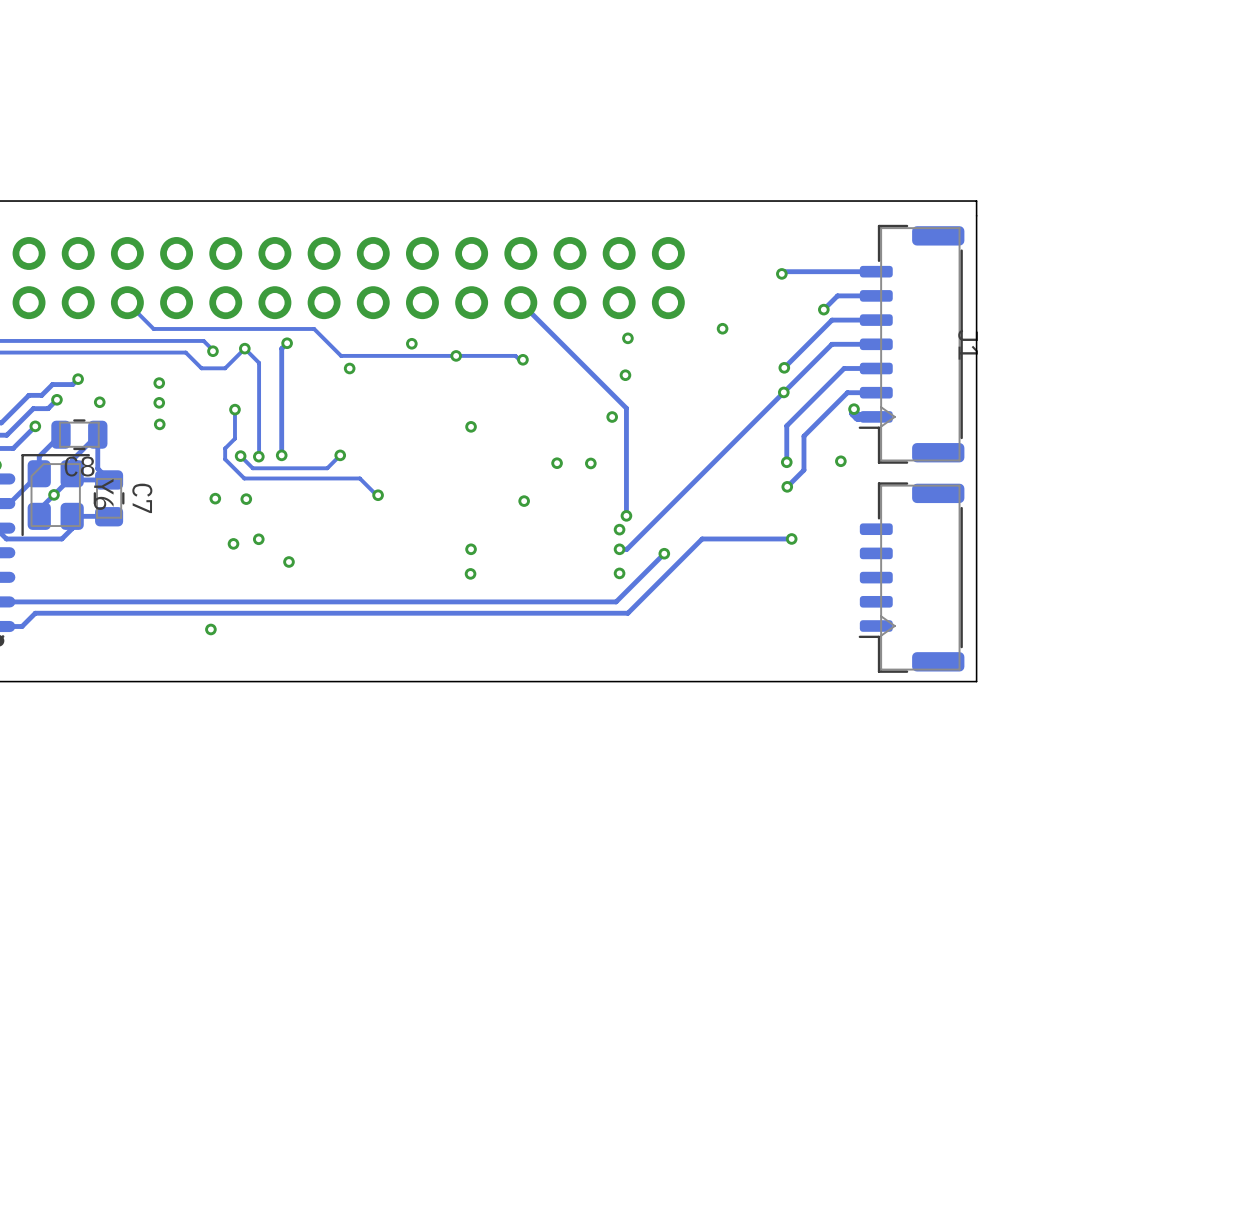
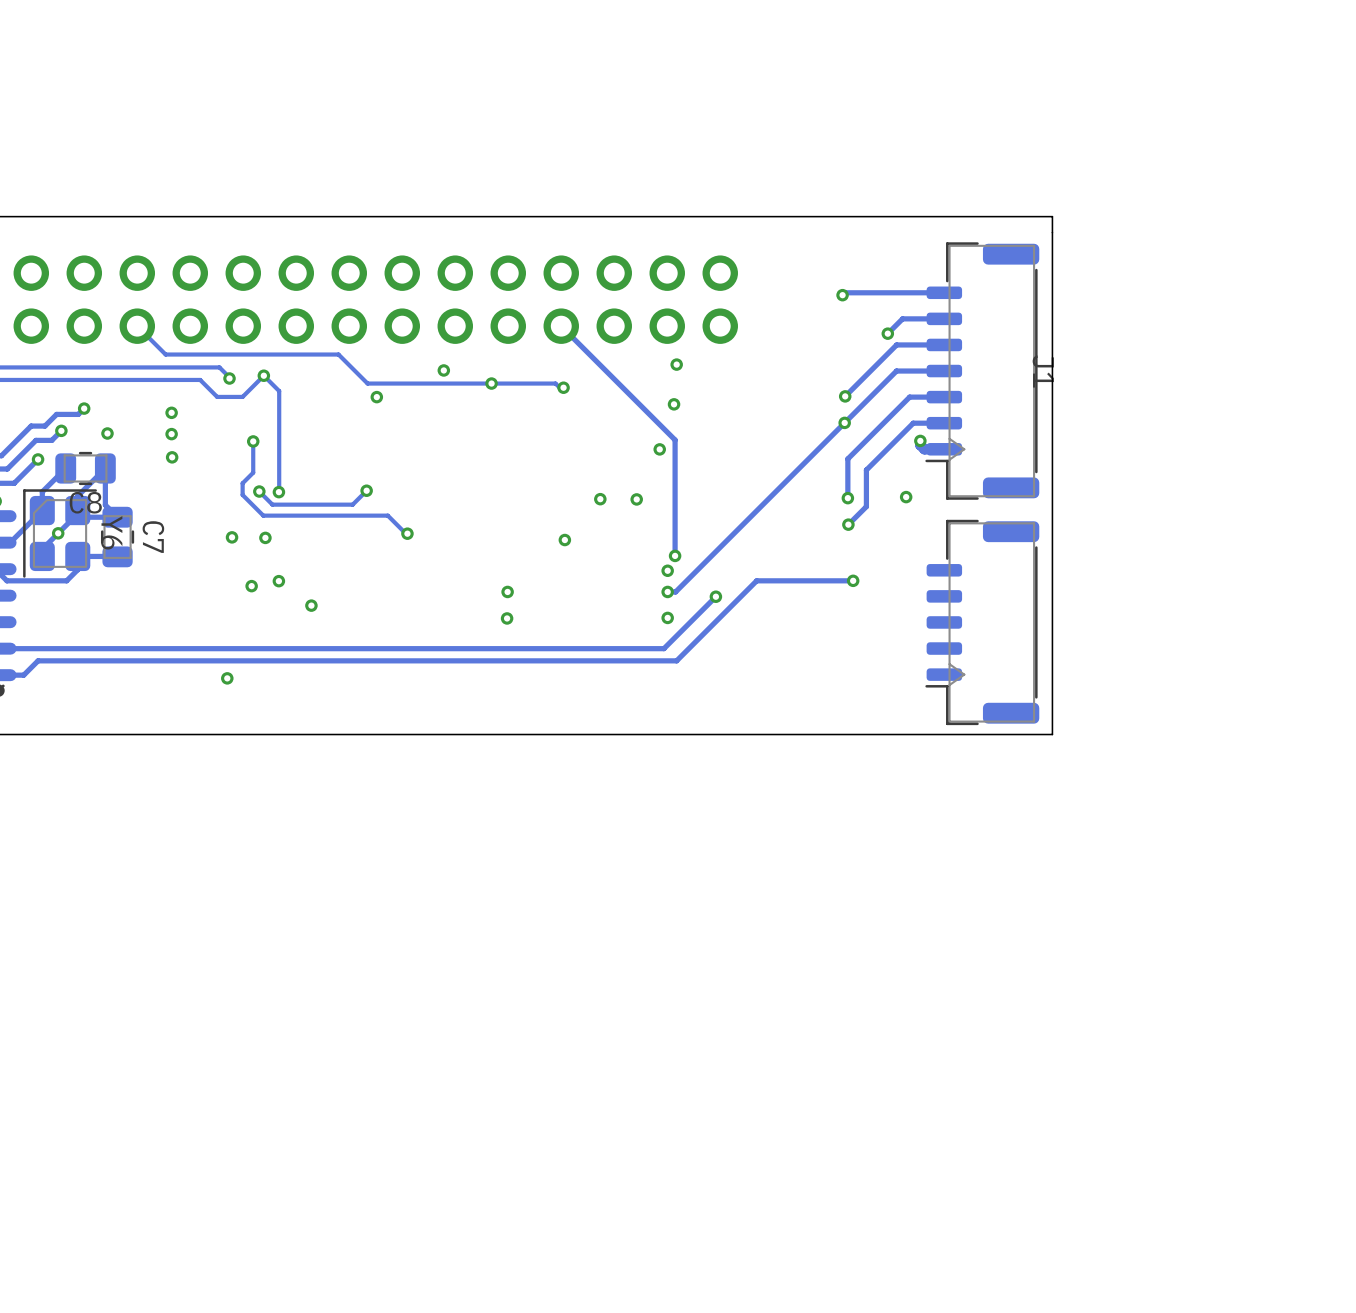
via: (722, 328) -> none
track: (287, 343) (281, 348) (281, 455) -> none
via: (287, 343) -> none
via: (471, 426) -> none
via: (281, 455) -> none

